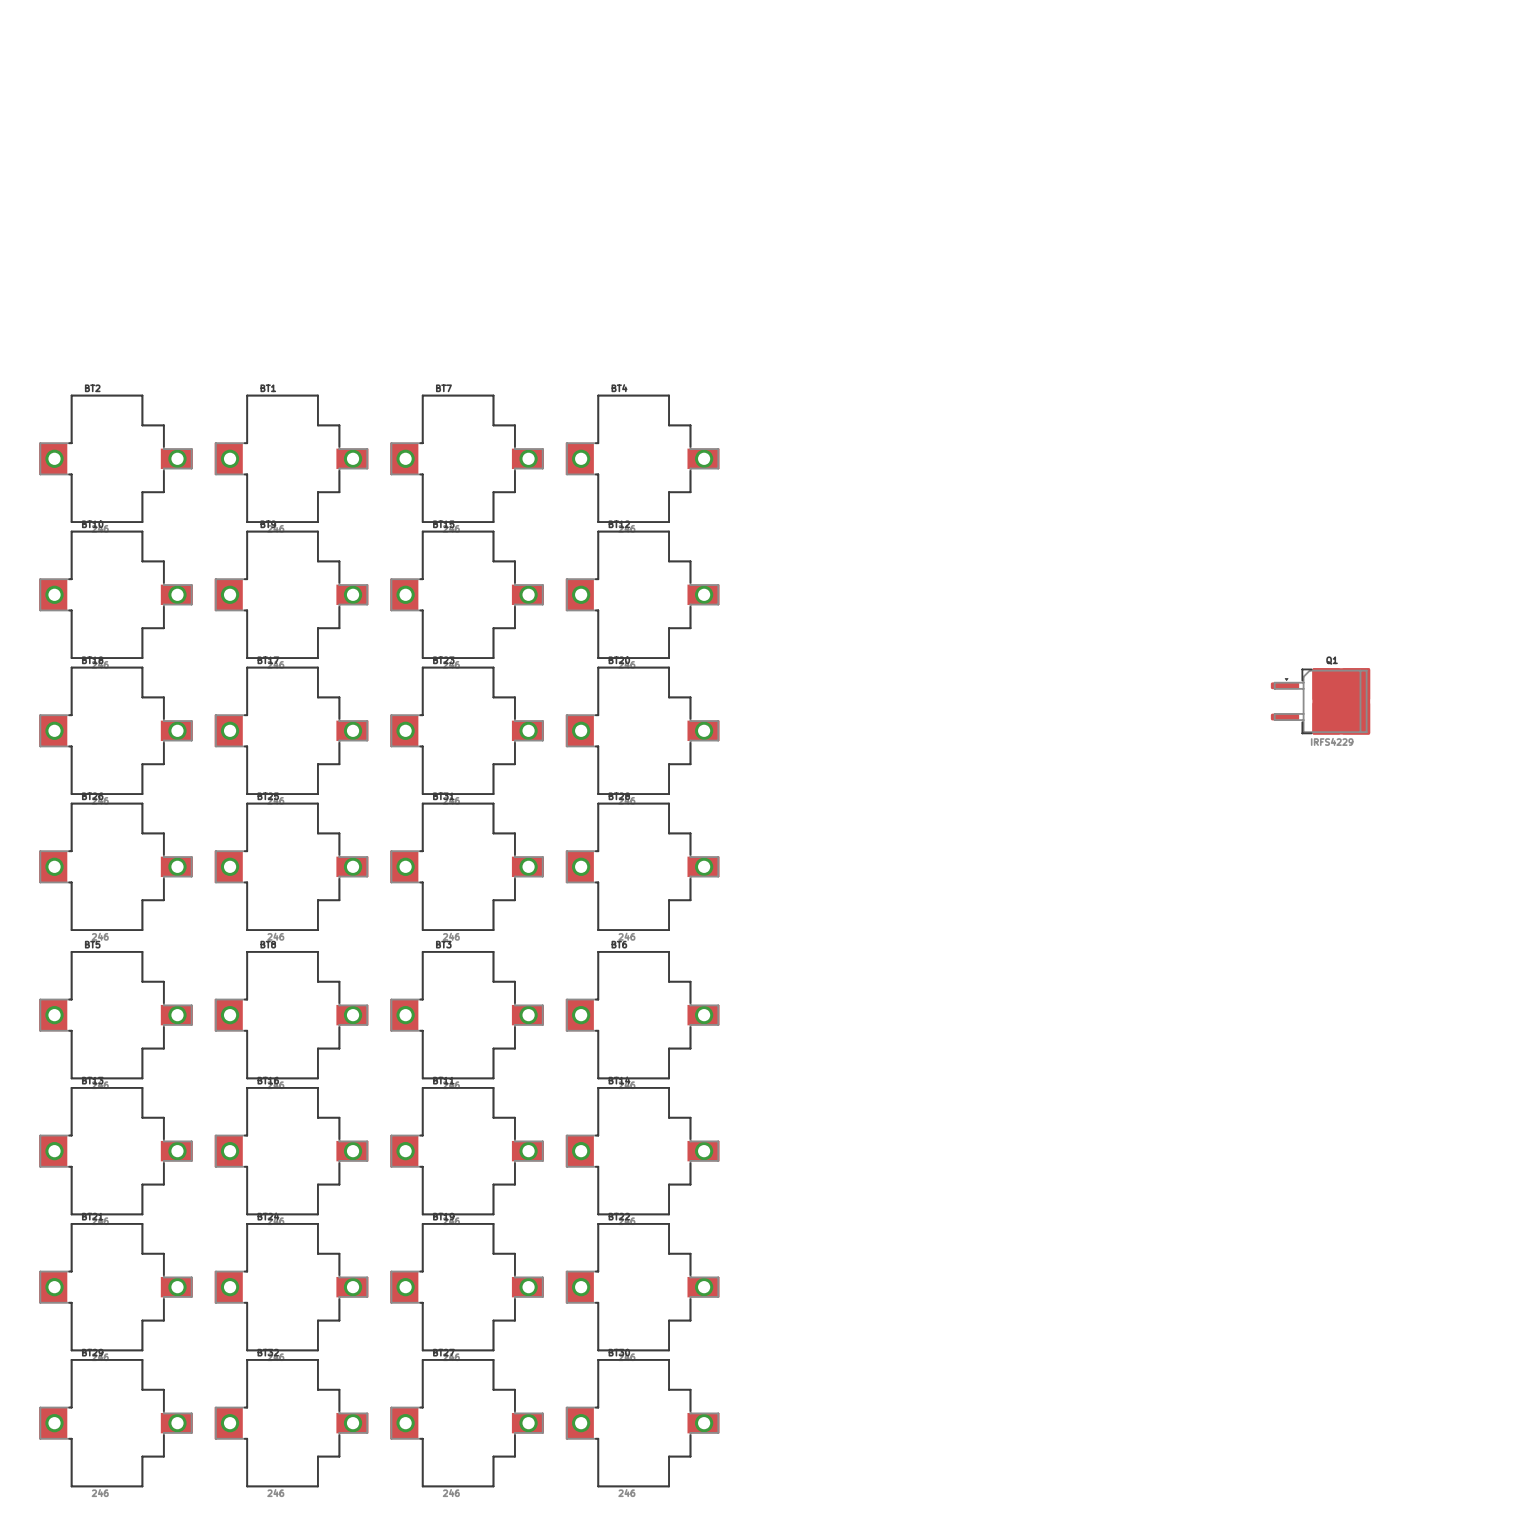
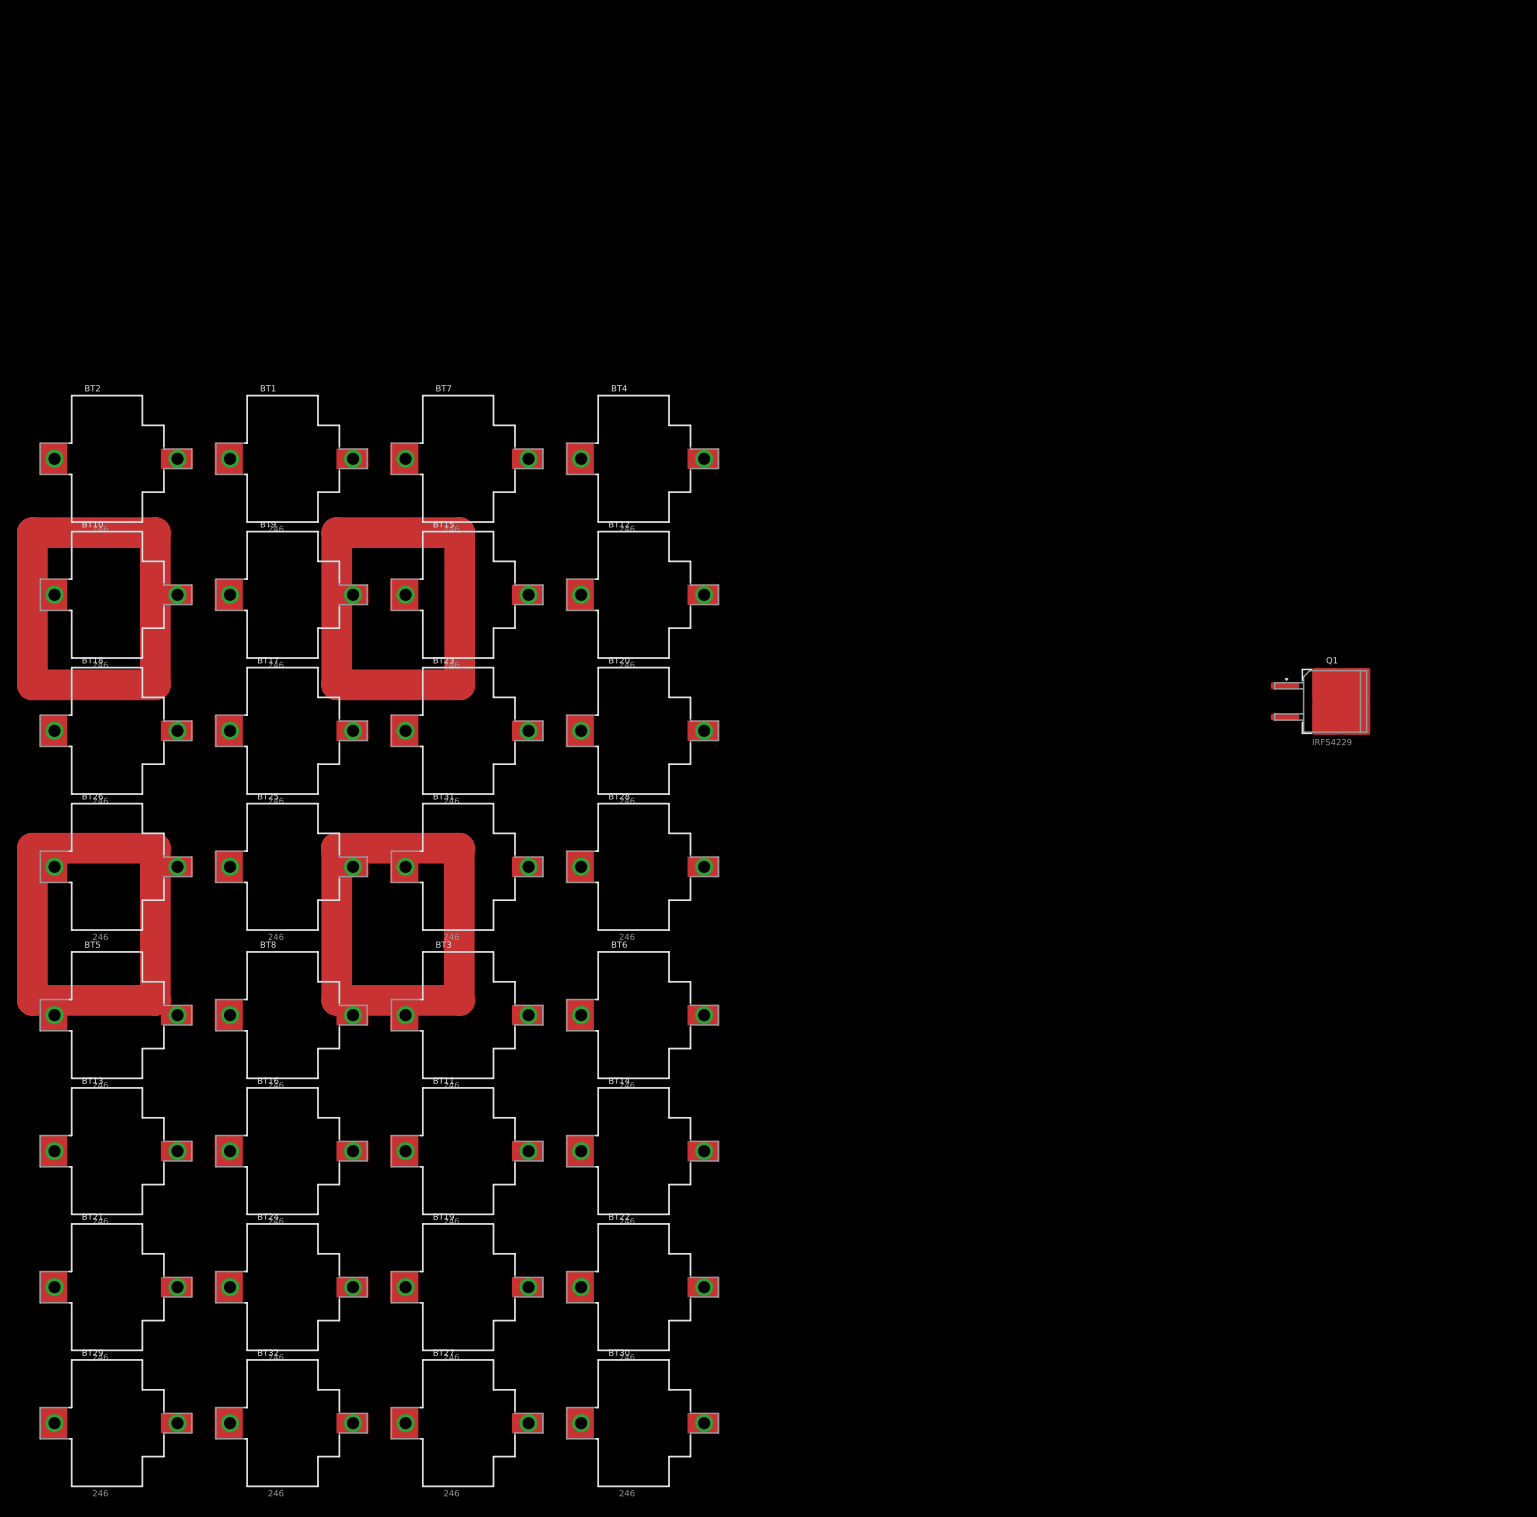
track: none -> (32, 532) (32, 684) (155, 684) (155, 532) (32, 532)
track: none -> (336, 532) (336, 684) (459, 684) (459, 532) (336, 532)
track: none -> (32, 848) (155, 848) (155, 1000) (32, 1000) (32, 848)
track: none -> (459, 848) (459, 1000) (336, 1000) (336, 848) (459, 848)

